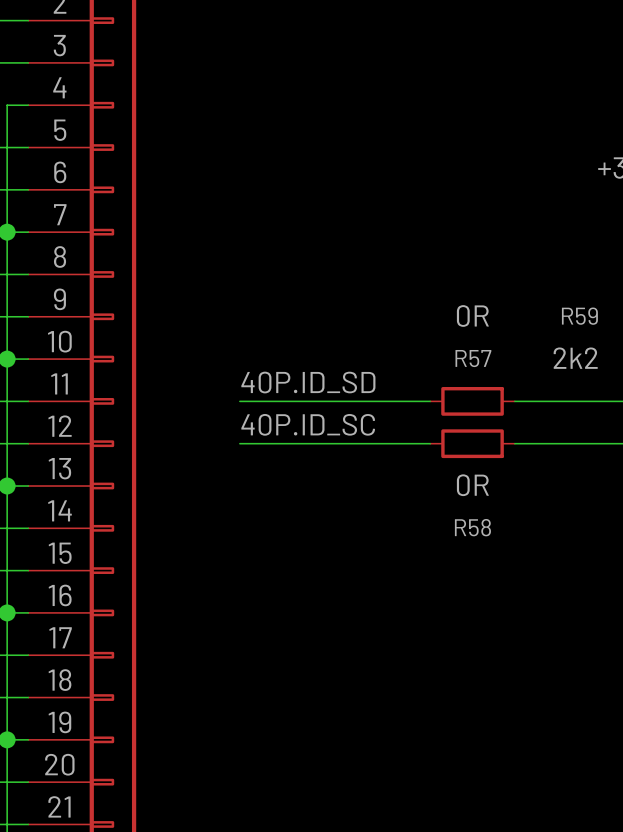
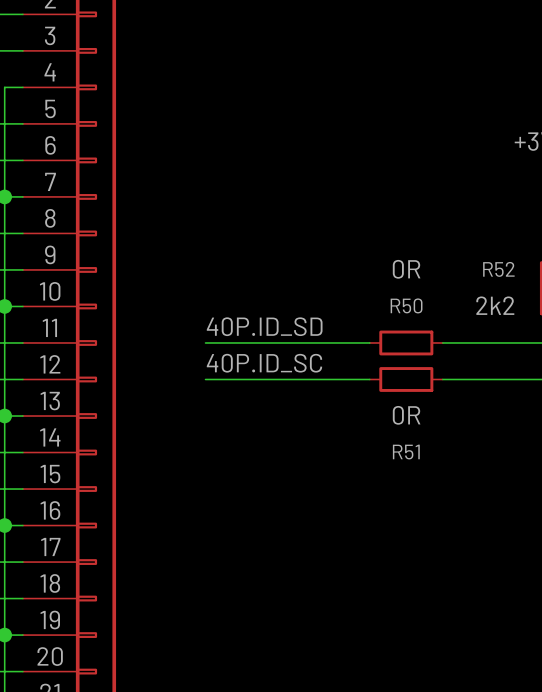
R59 name: R59 (579, 316) -> R52 (498, 269)
R57 name: R57 (473, 358) -> R50 (406, 305)
R58 name: R58 (472, 527) -> R51 (406, 452)

